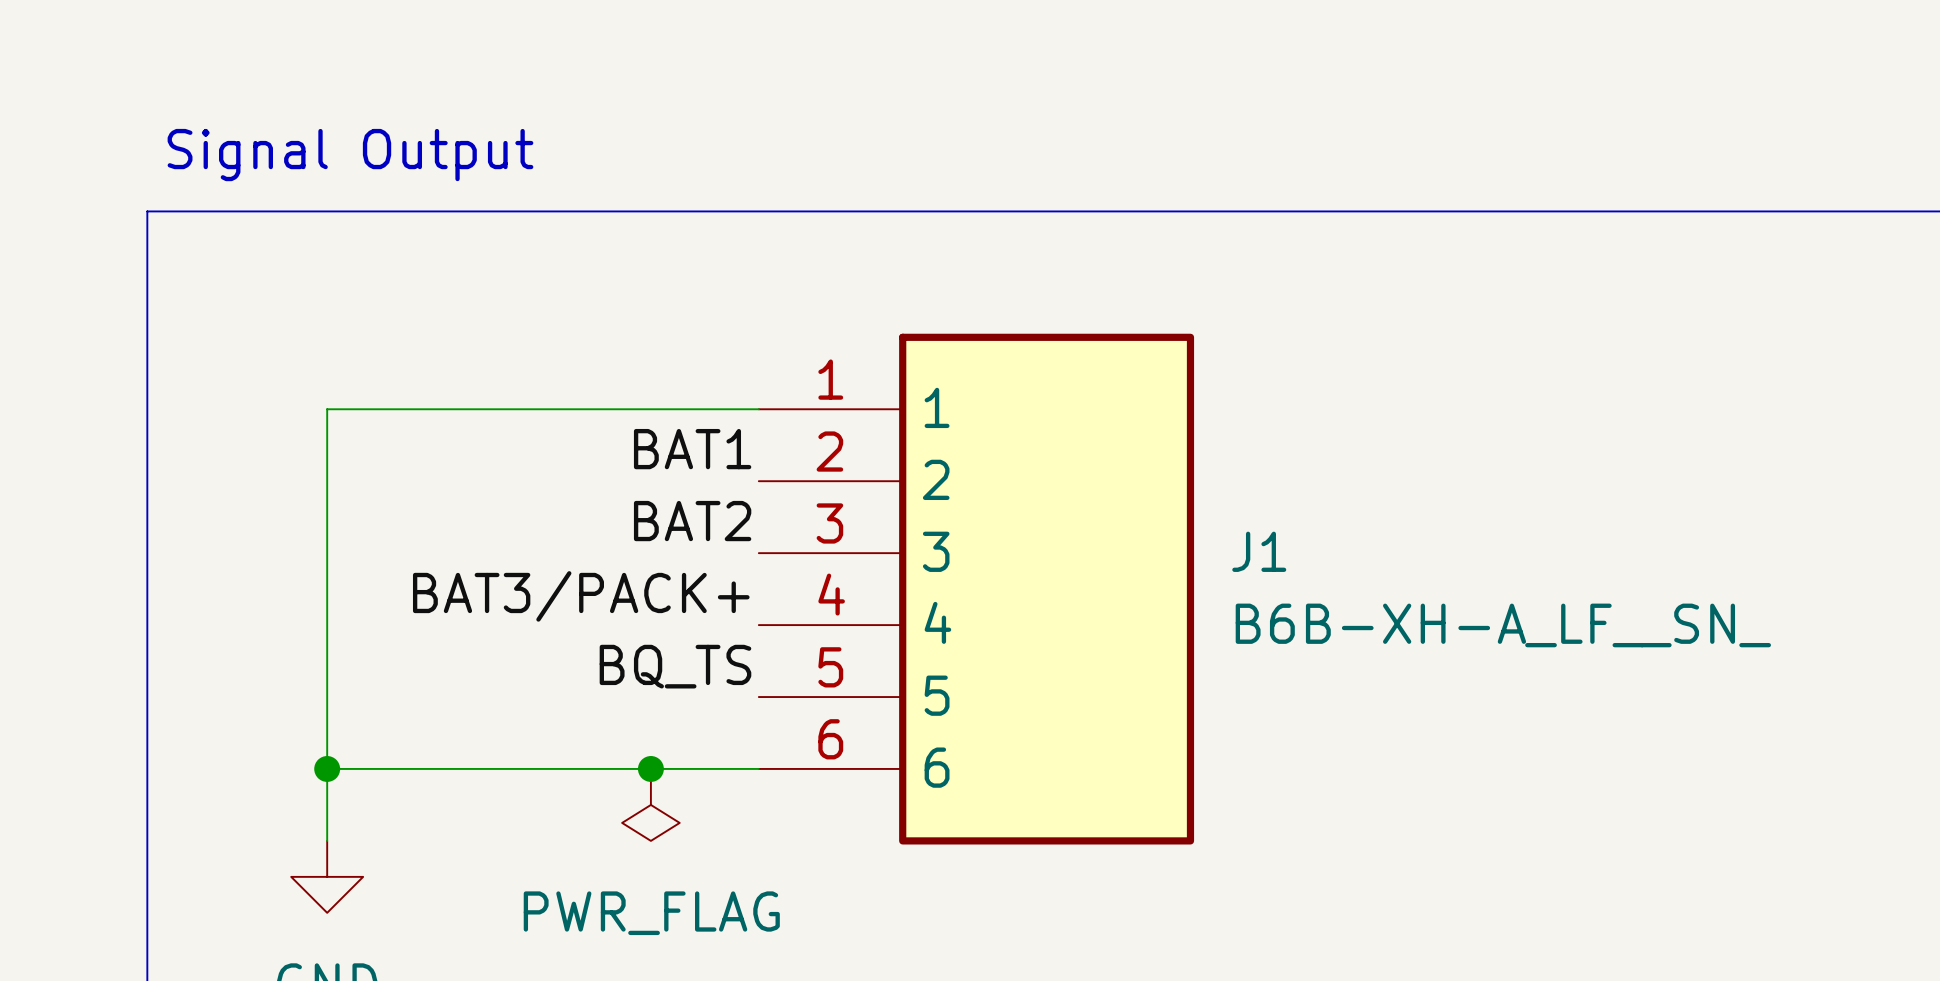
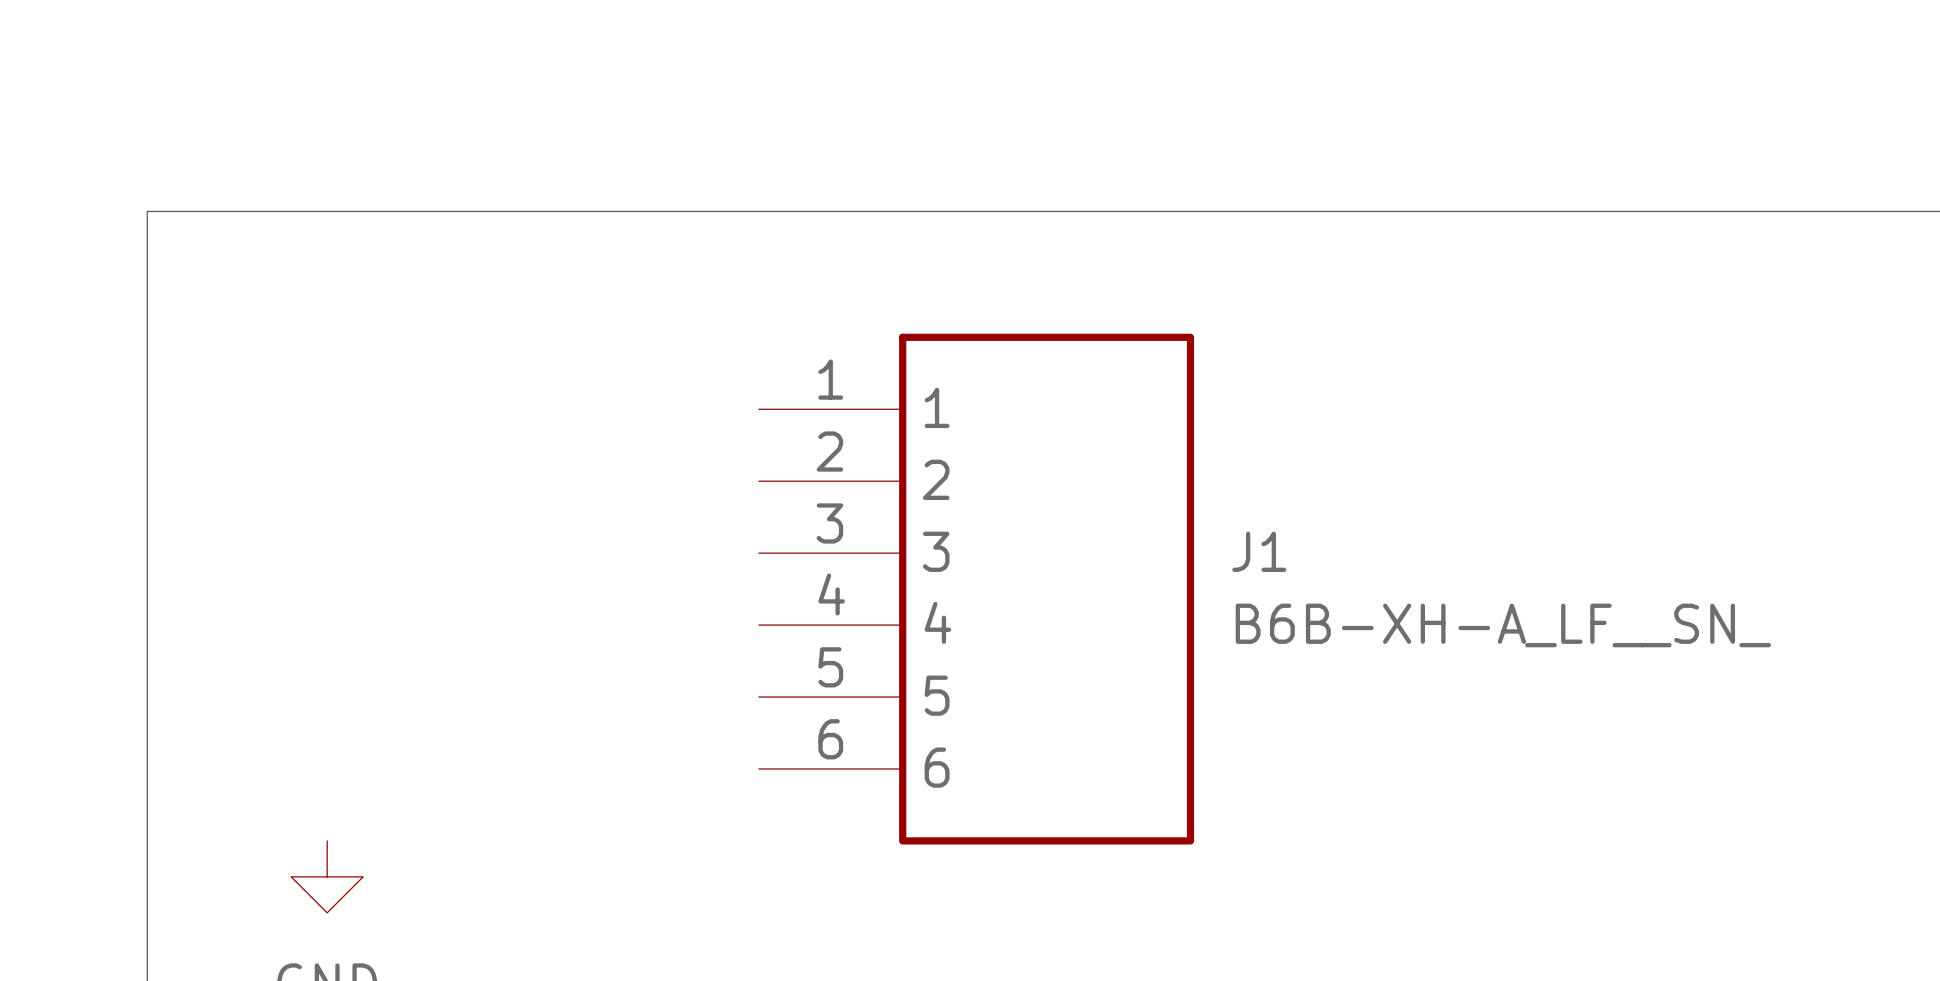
text: Signal Output (350, 155) -> none
wire: (758, 409) (327, 409) (327, 840) -> none
label: BAT1 (692, 449) -> none
label: BAT2 (692, 521) -> none
label: BAT3/PACK+ (581, 596) -> none
label: BQ_TS (675, 666) -> none
wire: (327, 768) (758, 768) -> none
junction: (327, 768) -> none
junction: (650, 768) -> none
power symbol: PWR_FLAG (650, 804) -> none

